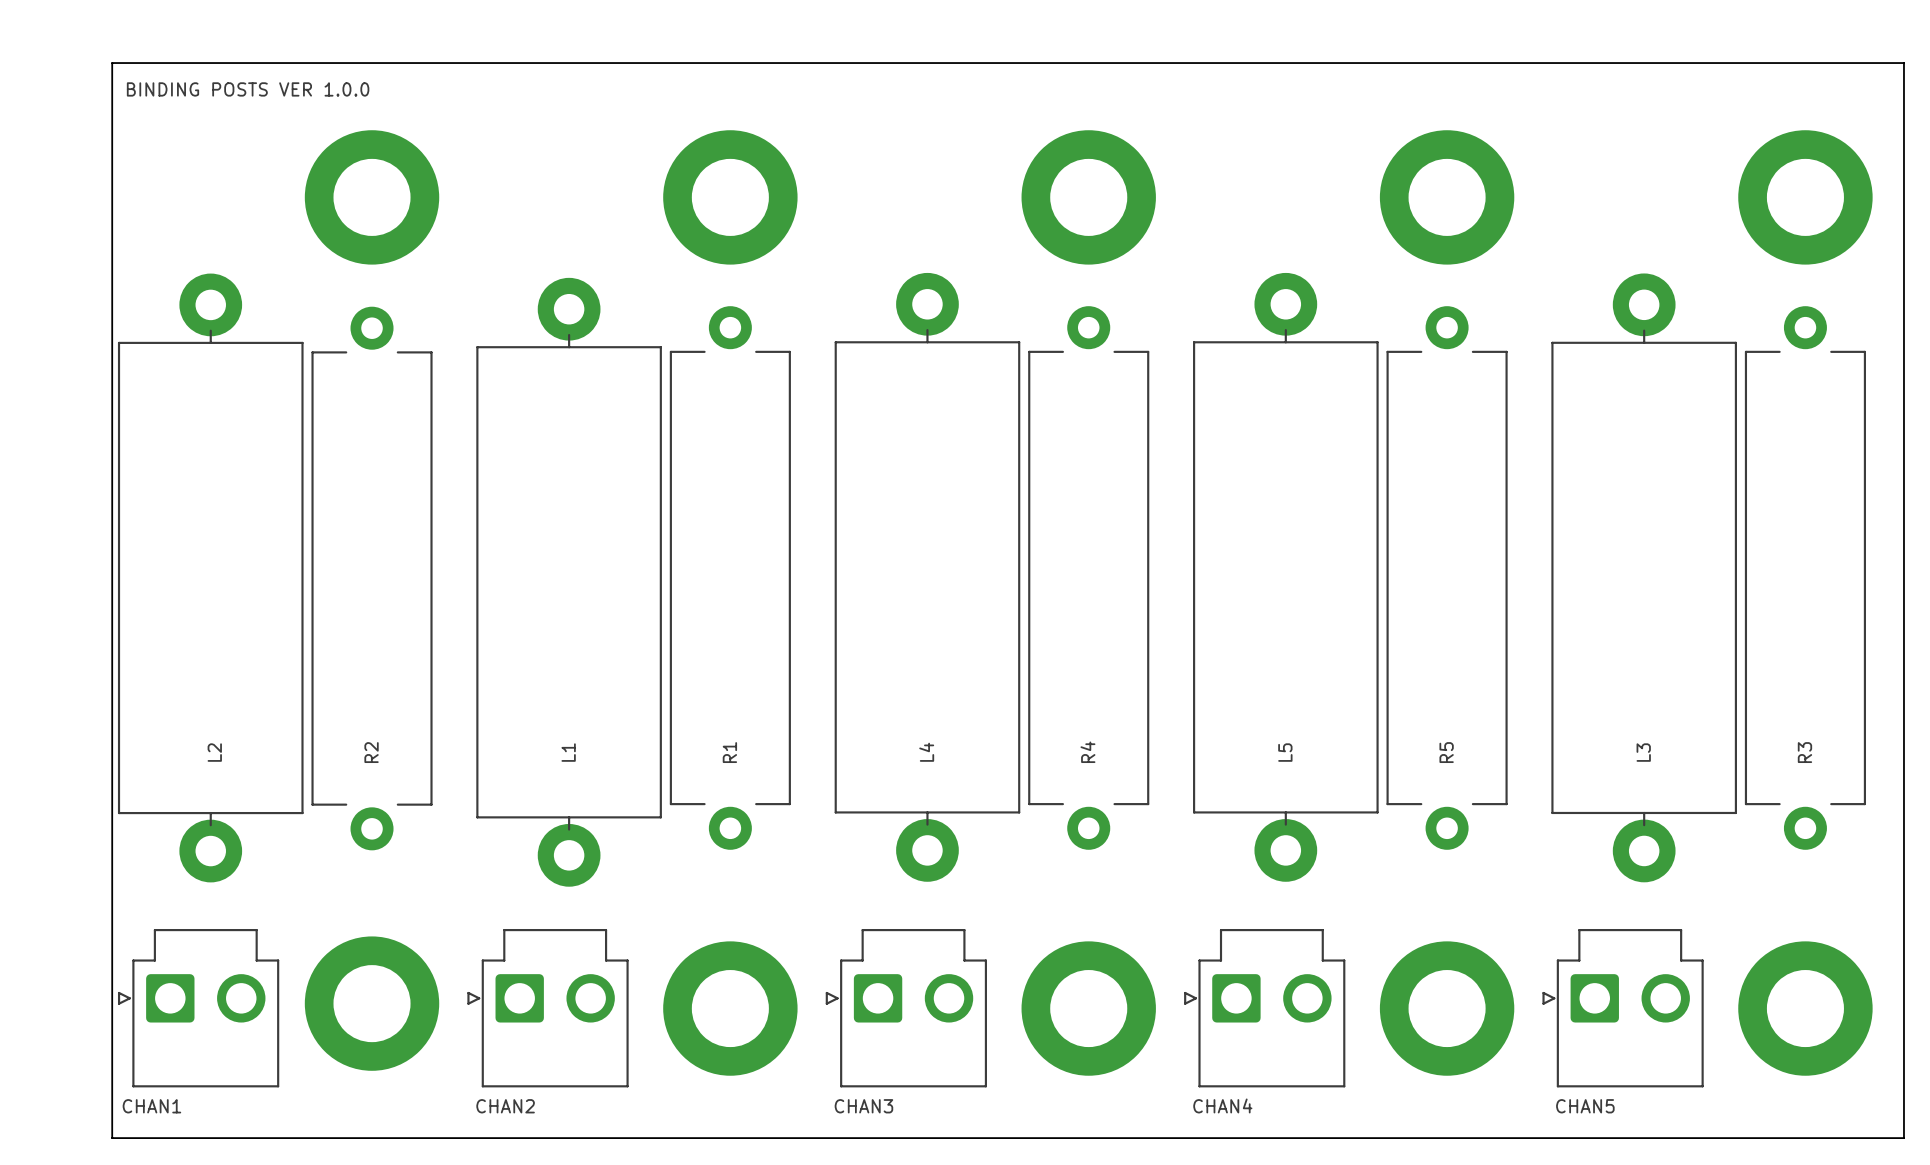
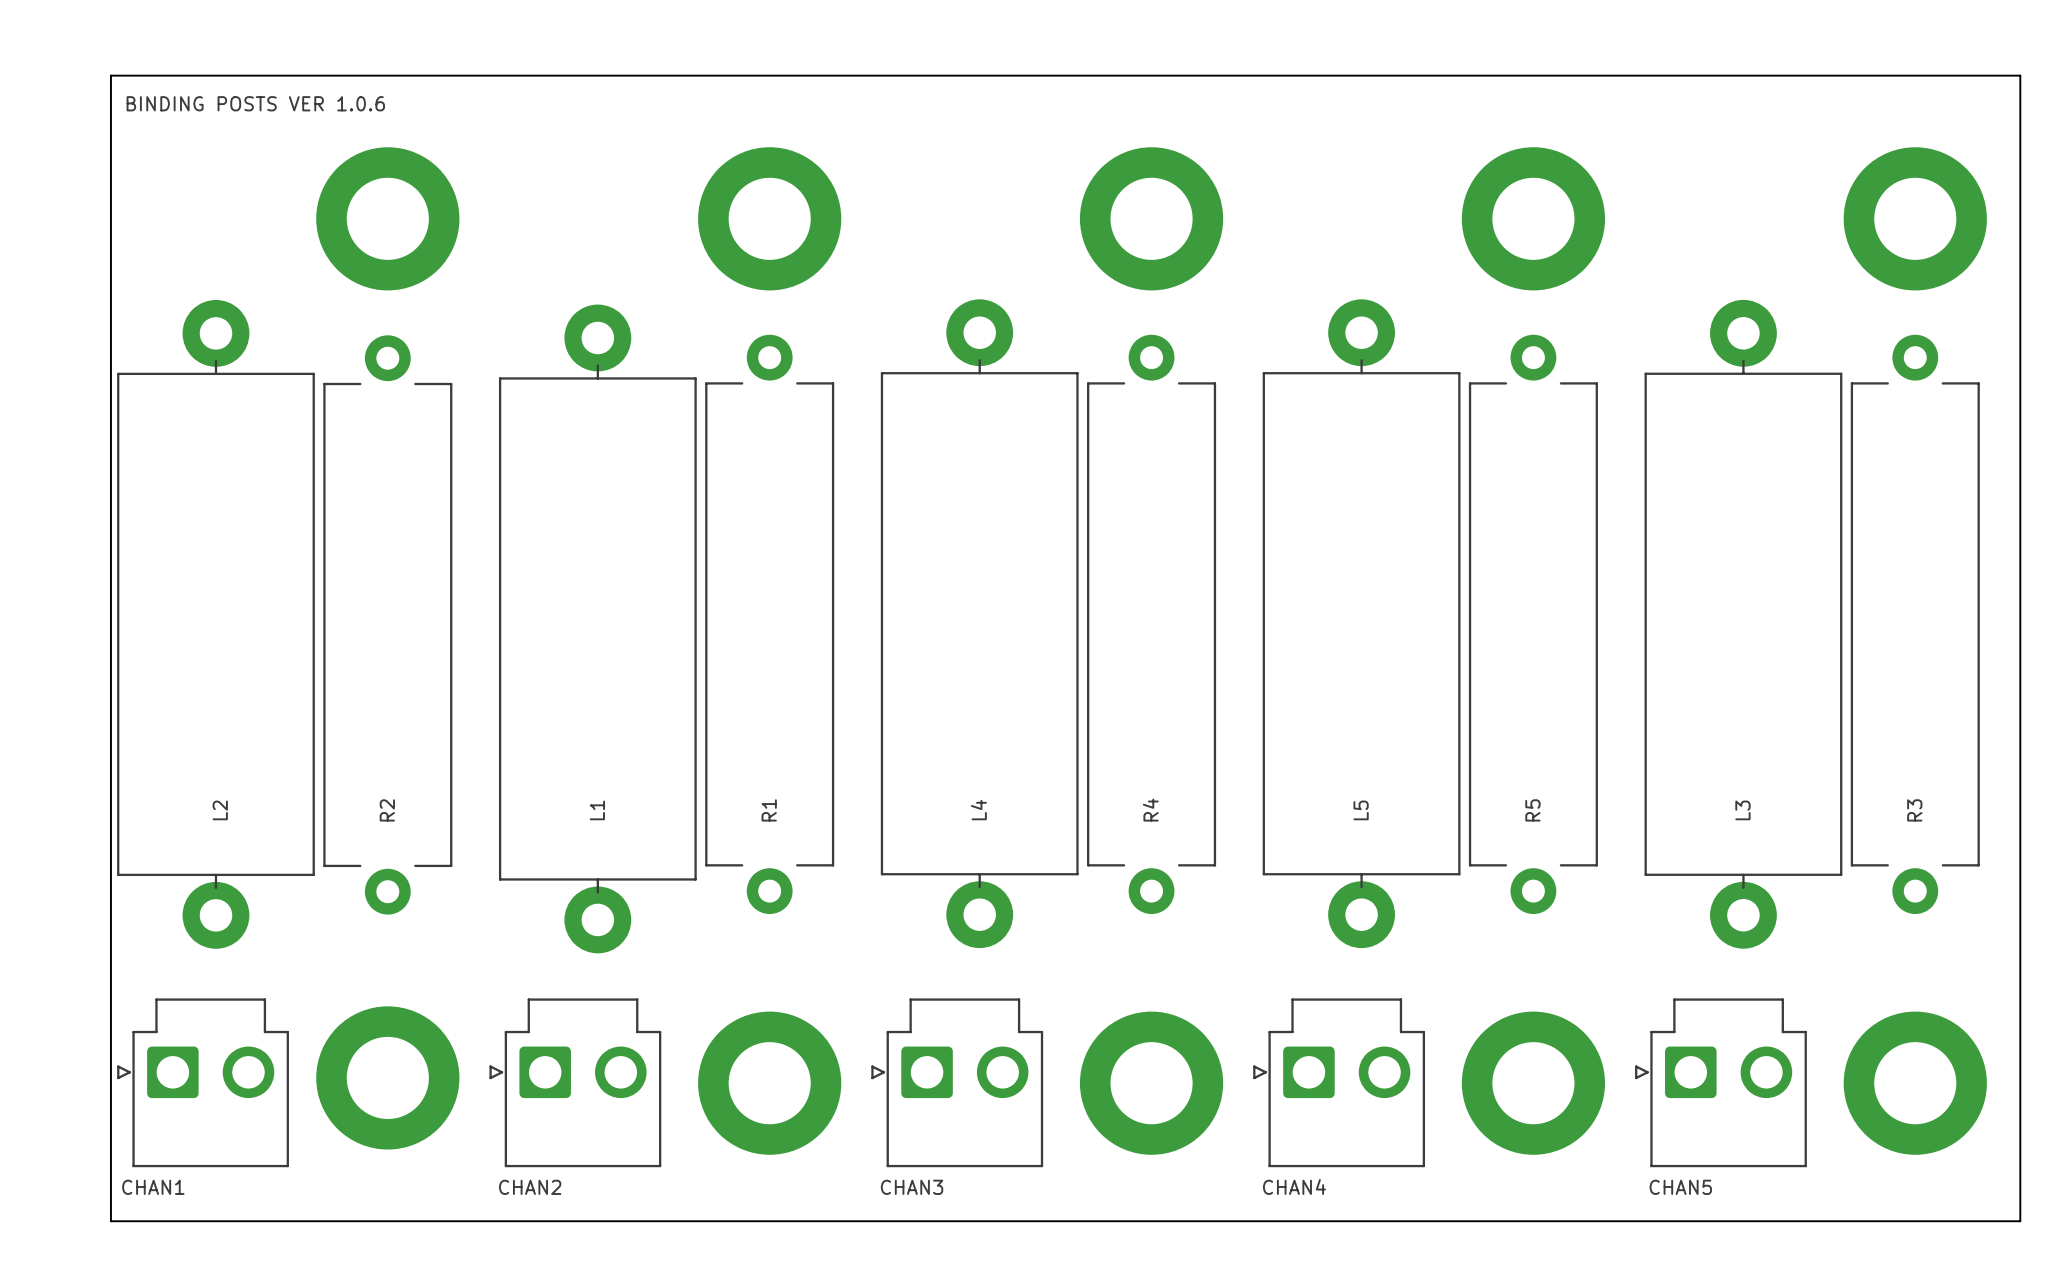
text: BINDING POSTS VER 1.0.0 (248, 89) -> BINDING POSTS VER 1.0.6 (255, 103)

